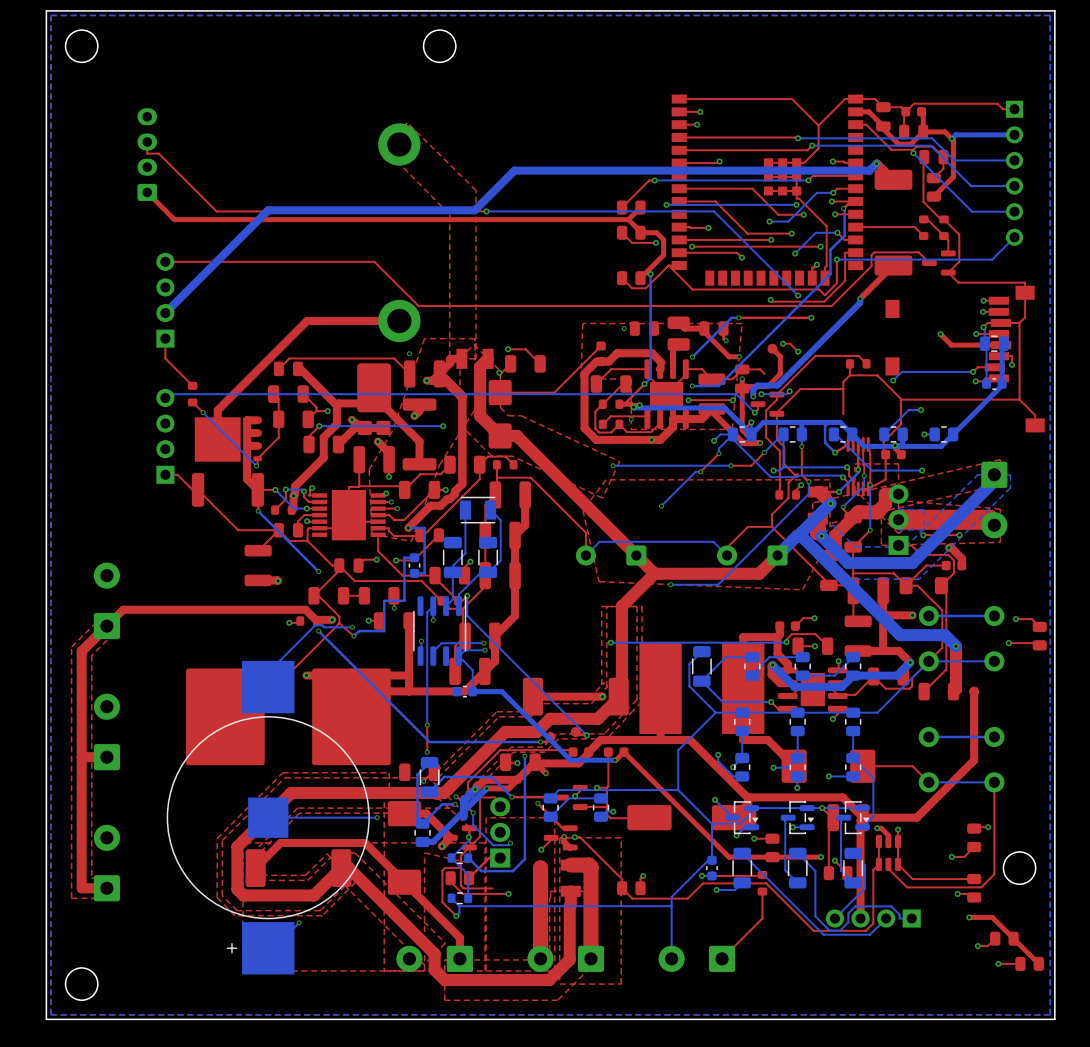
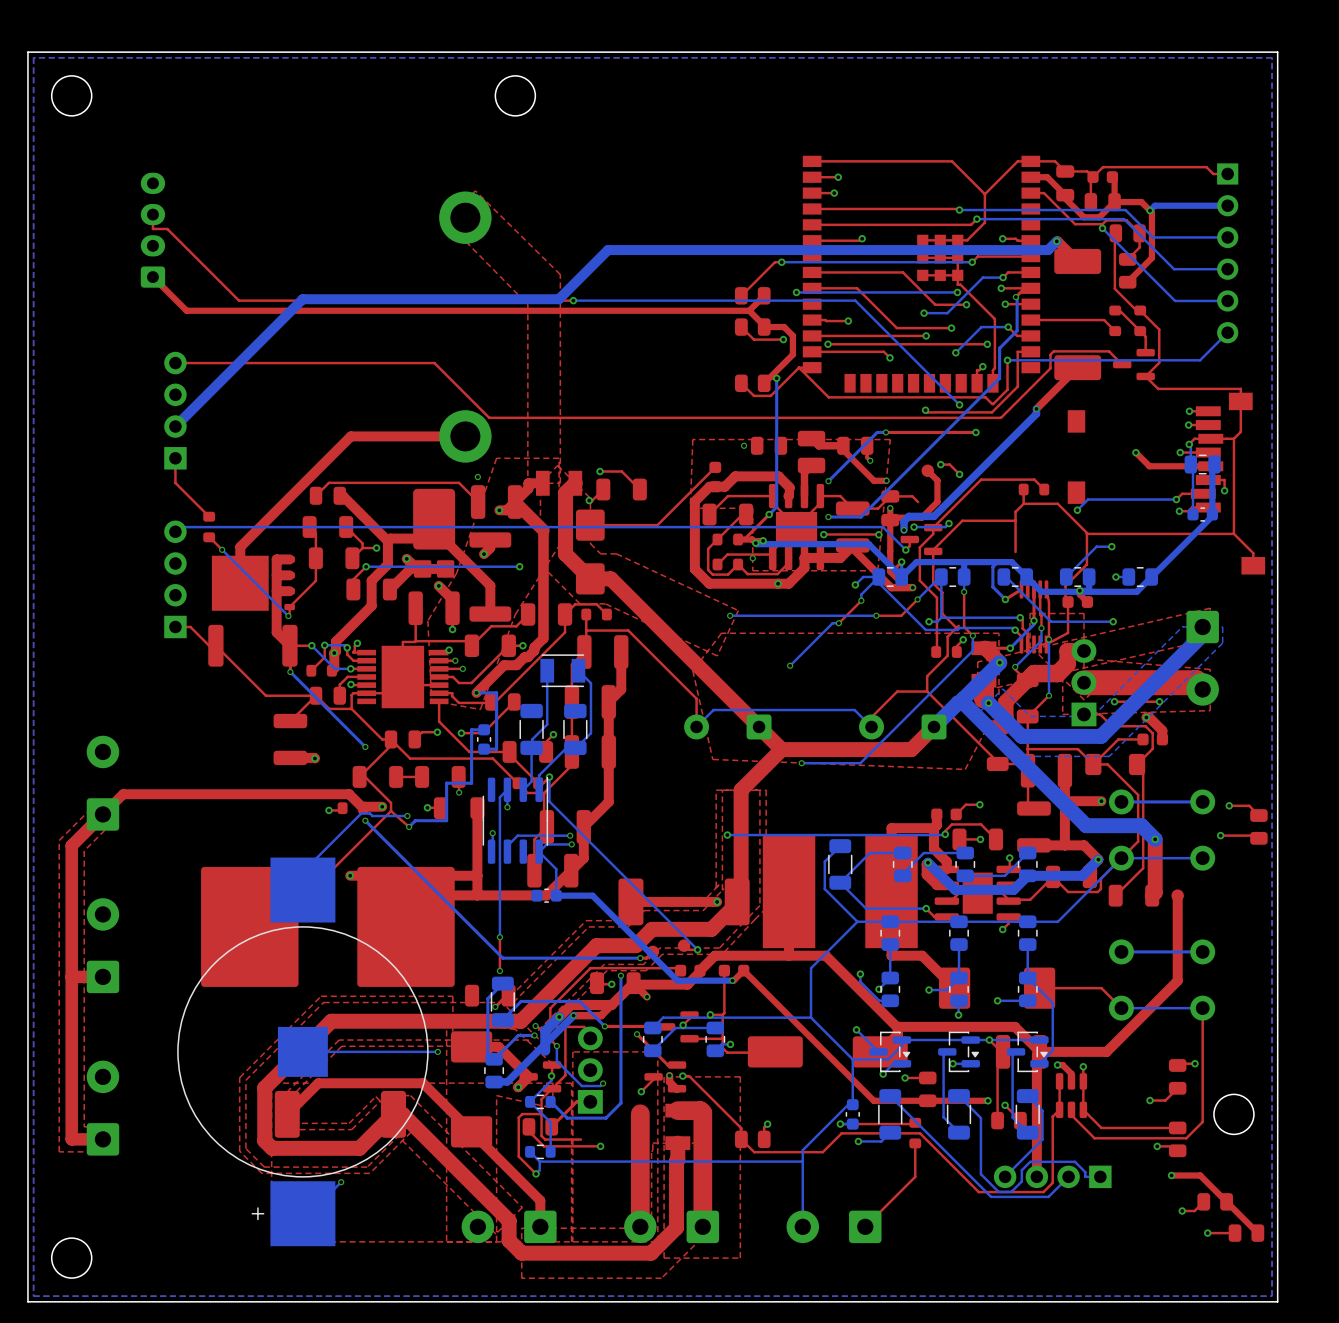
bottom zone outline: (923, 509) (898, 509) (898, 529) (923, 529) (923, 509) -> none

